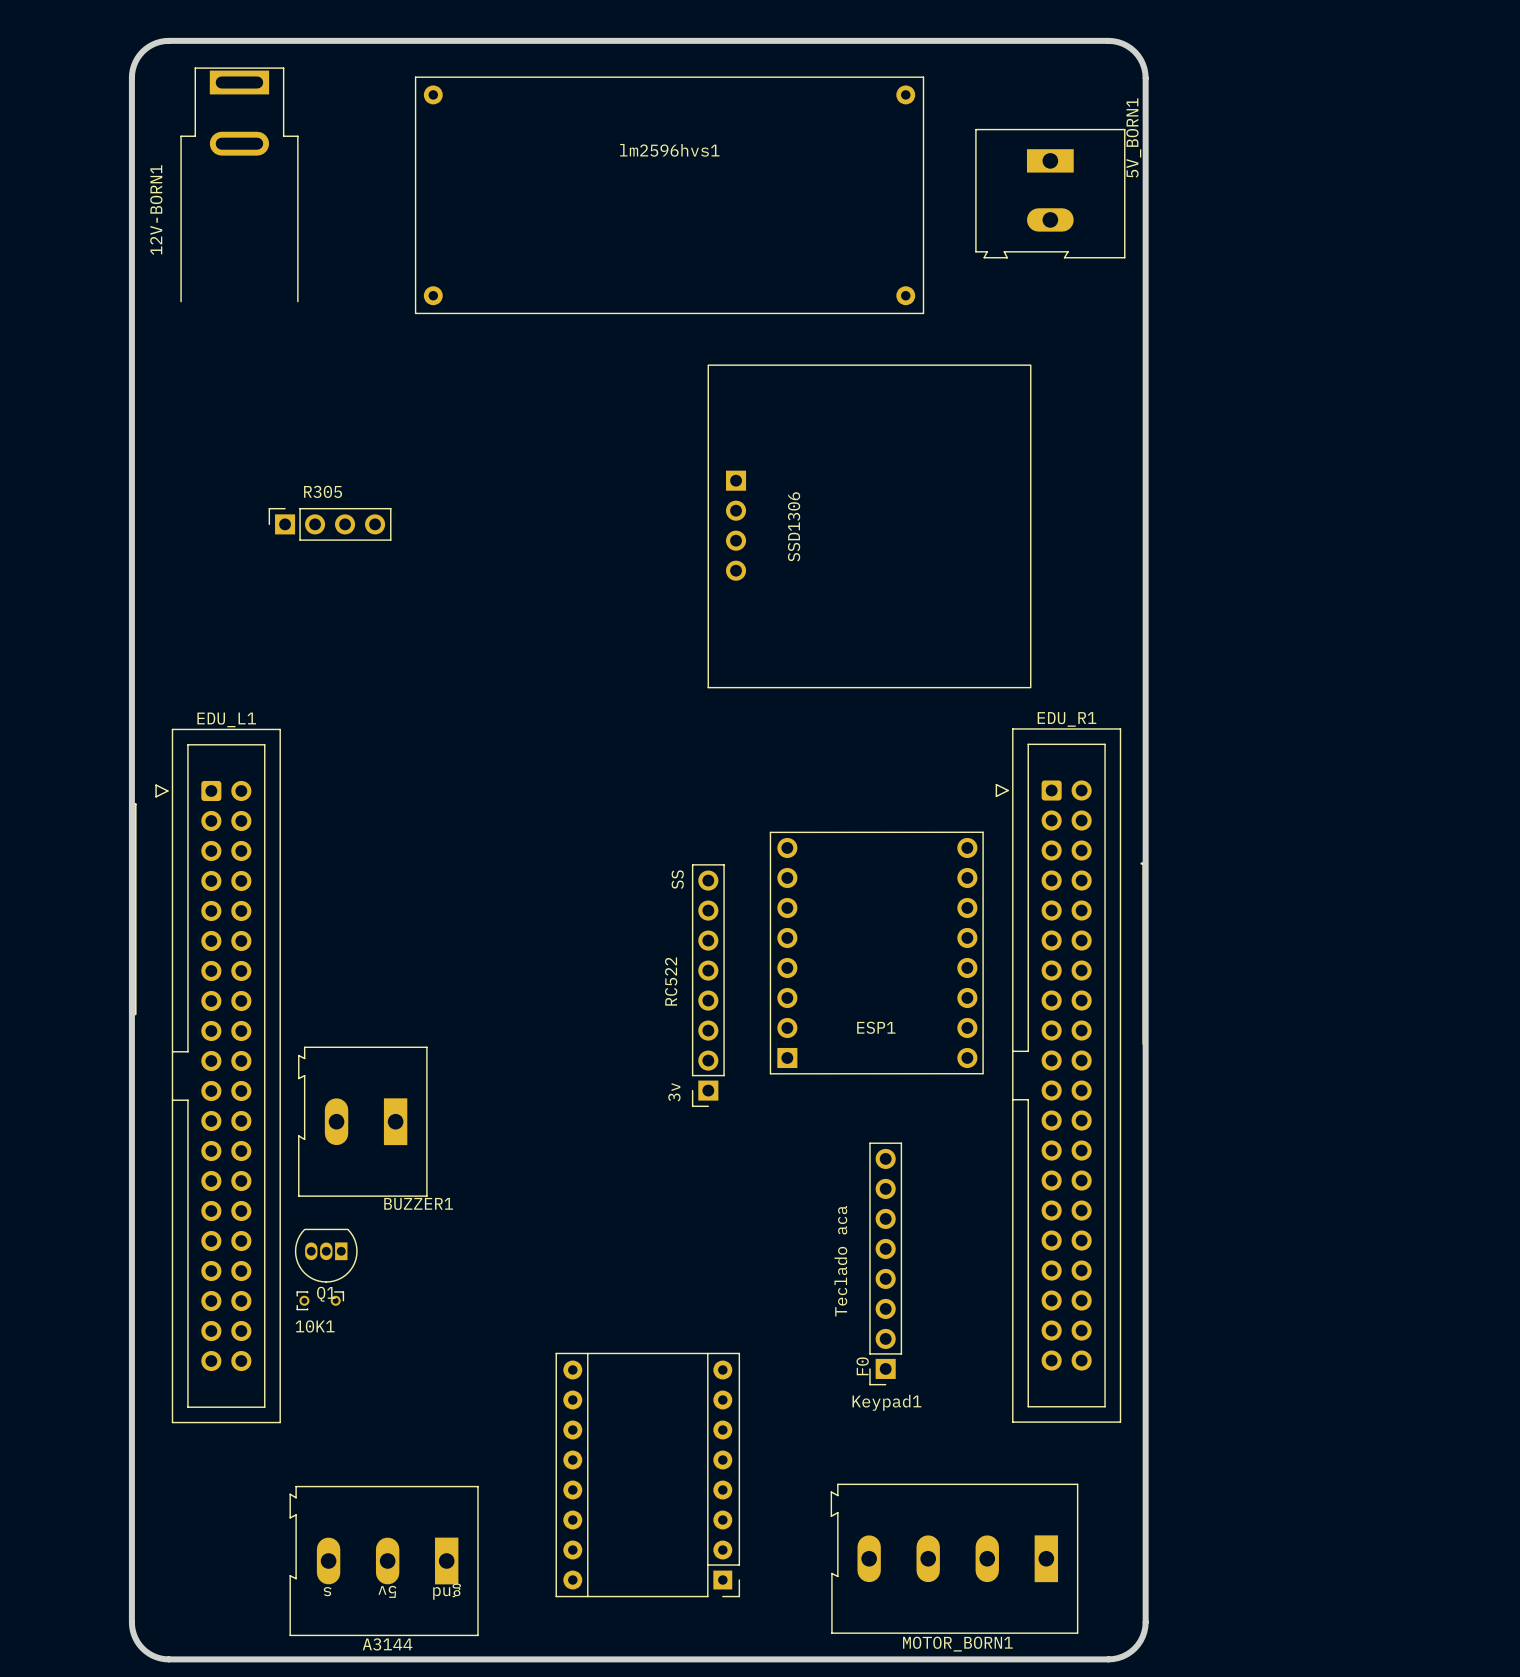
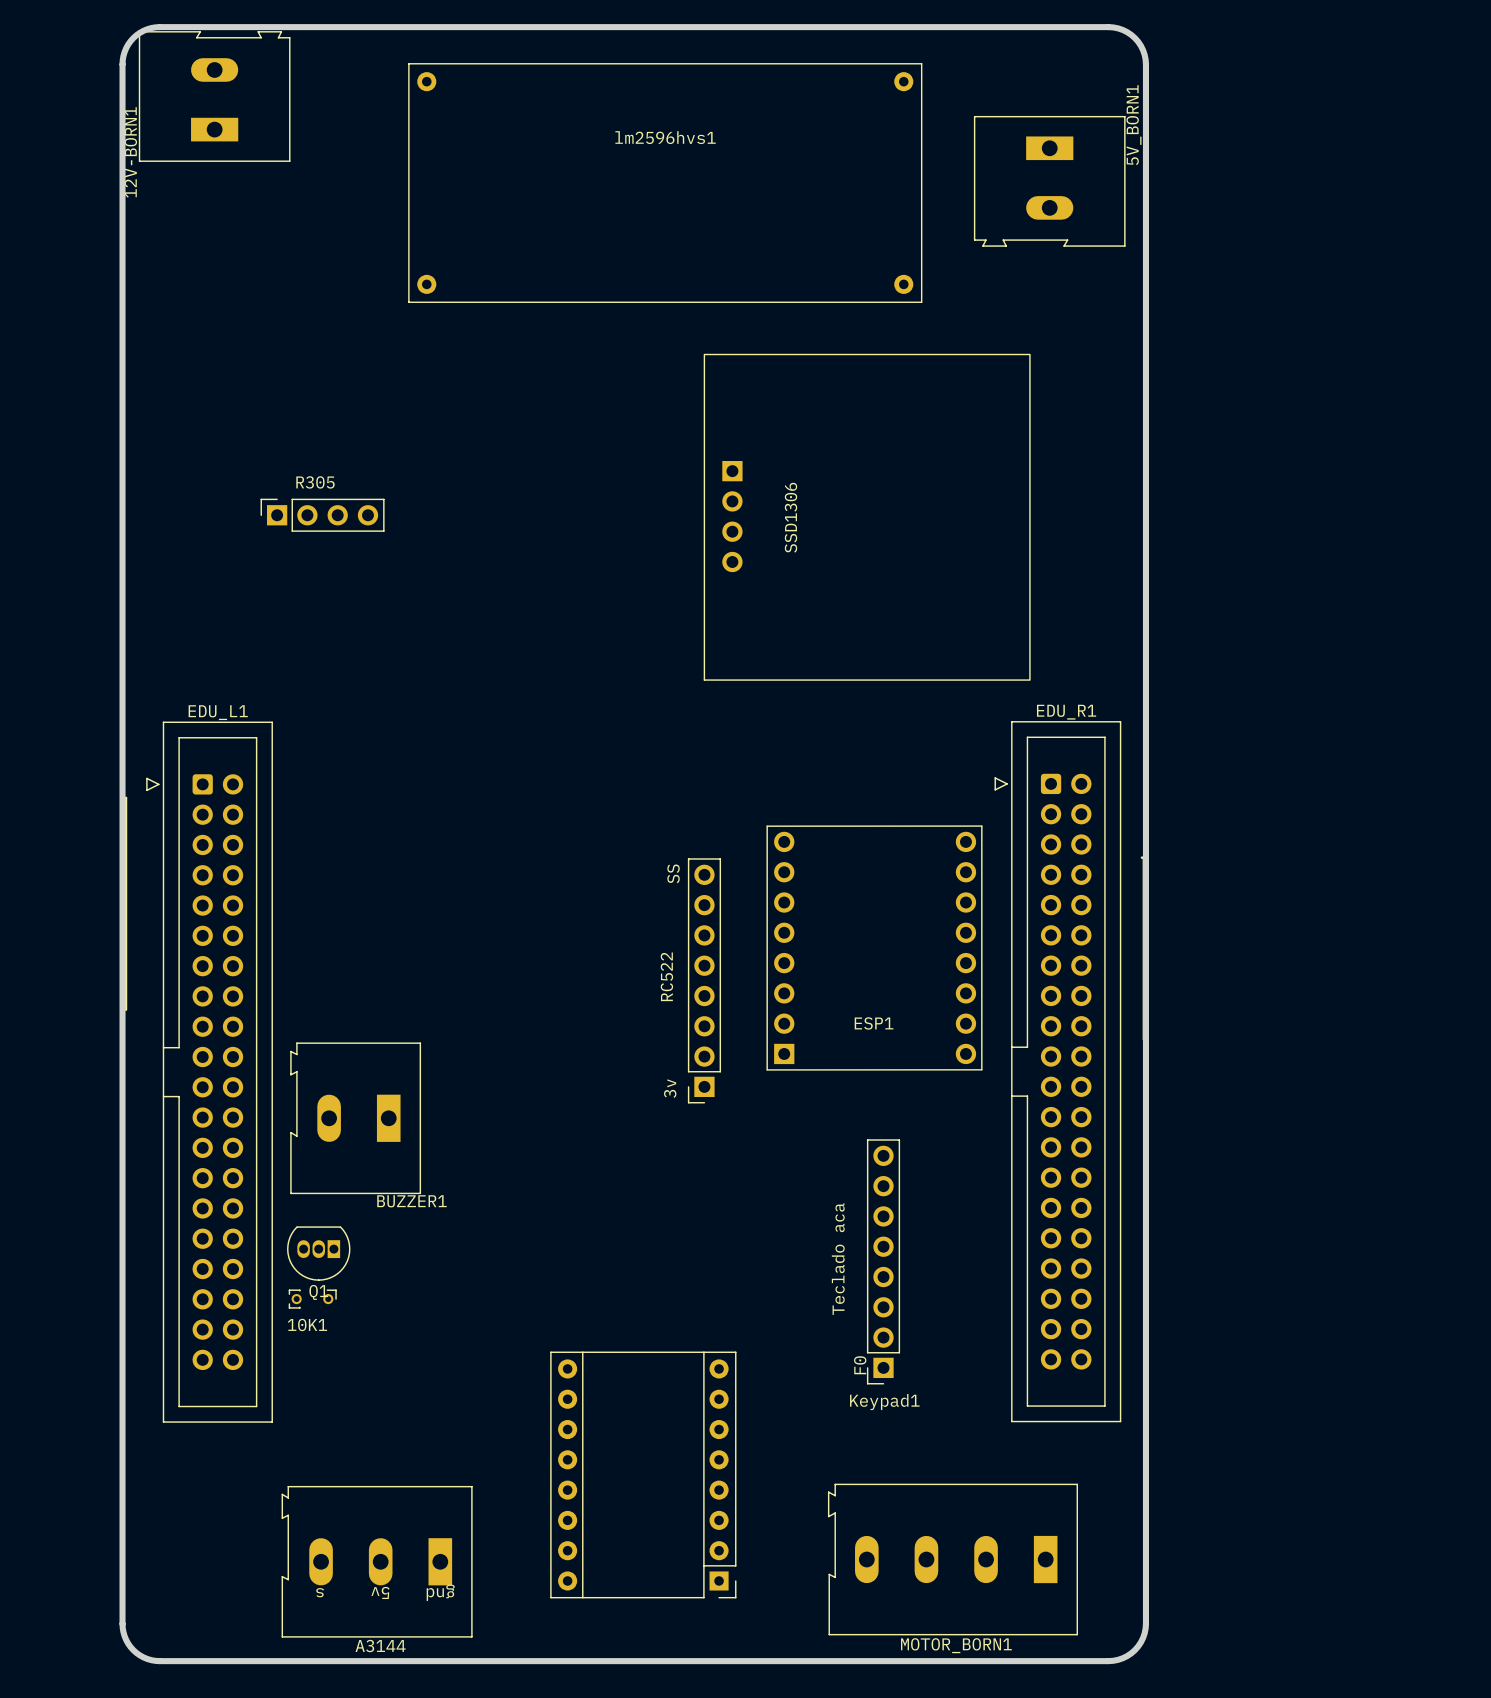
12V-BORN1 footprint: [180, 67, 299, 303] -> [138, 31, 291, 162]
12V-BORN1 name position: 12V-BORN1 (156, 210) -> 12V-BORN1 (130, 152)

